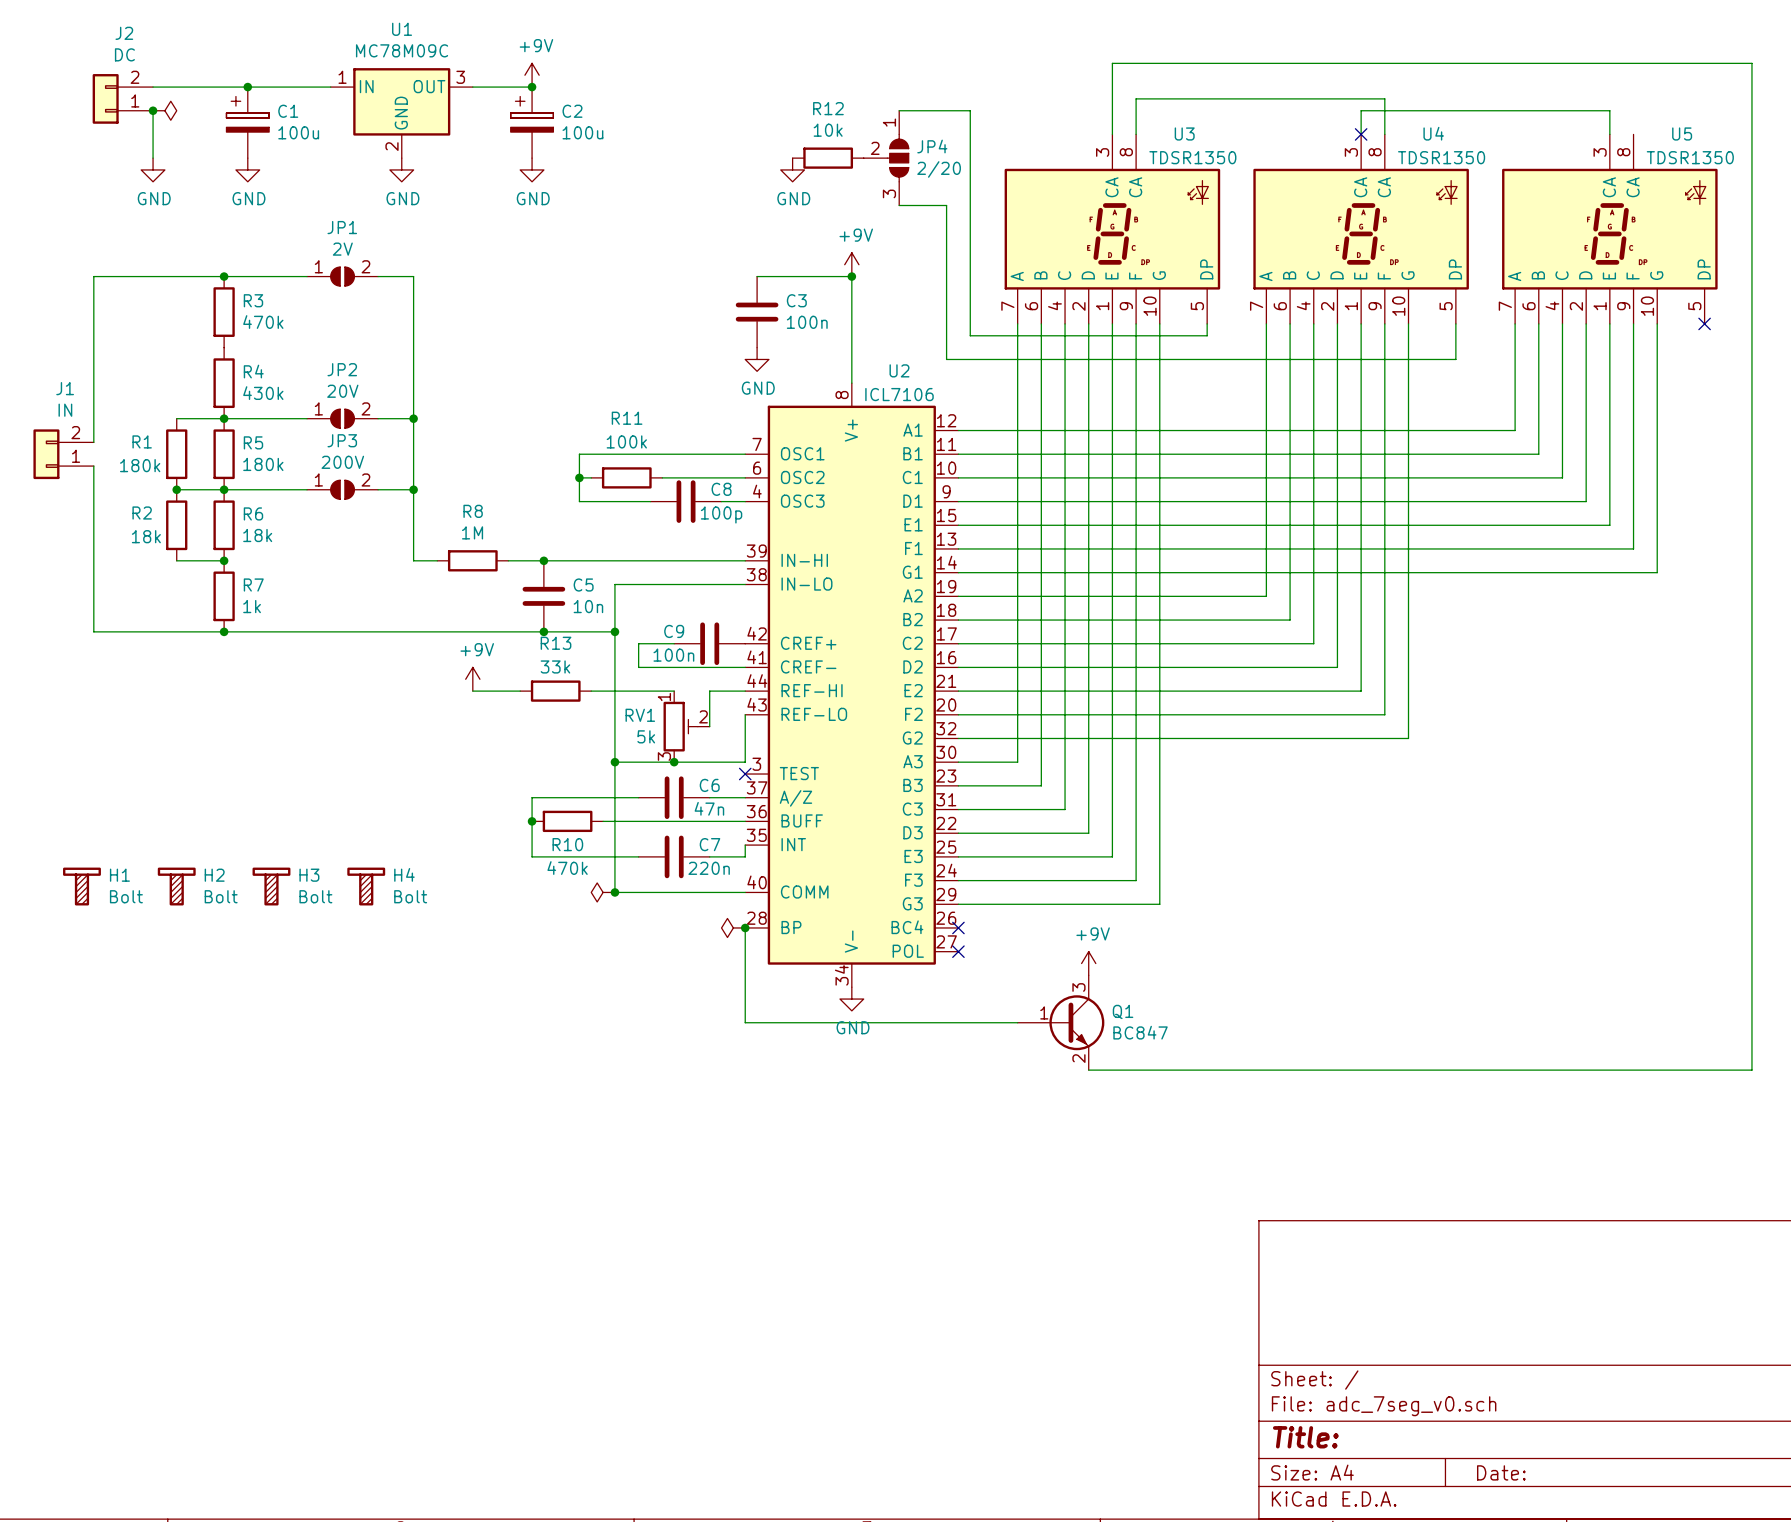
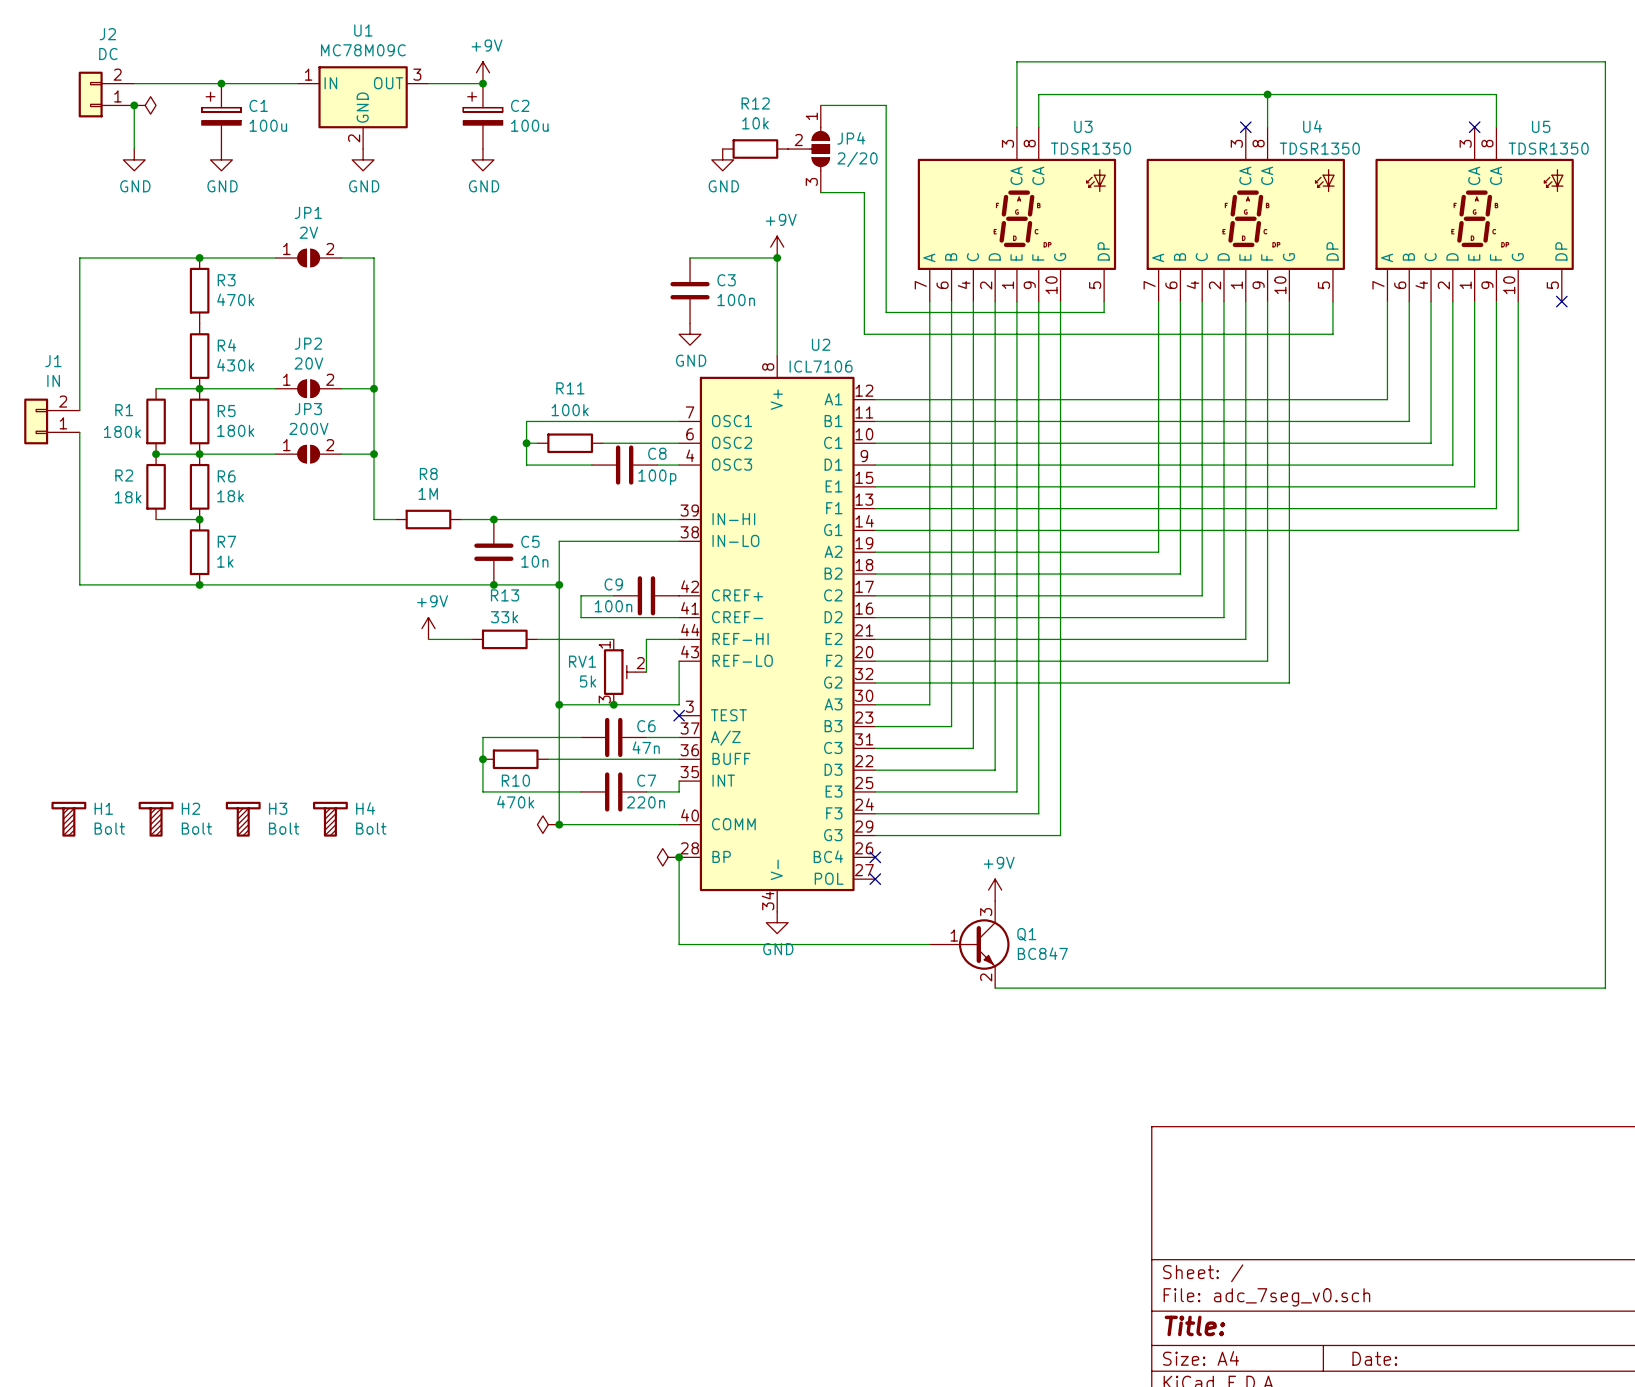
wire: none -> (1267, 94) (1496, 94) (1496, 127)
junction: none -> (1267, 94)
wire: (1361, 134) (1361, 110) (1609, 110) (1609, 134) -> none
no-connect mark: none -> (1474, 127)

